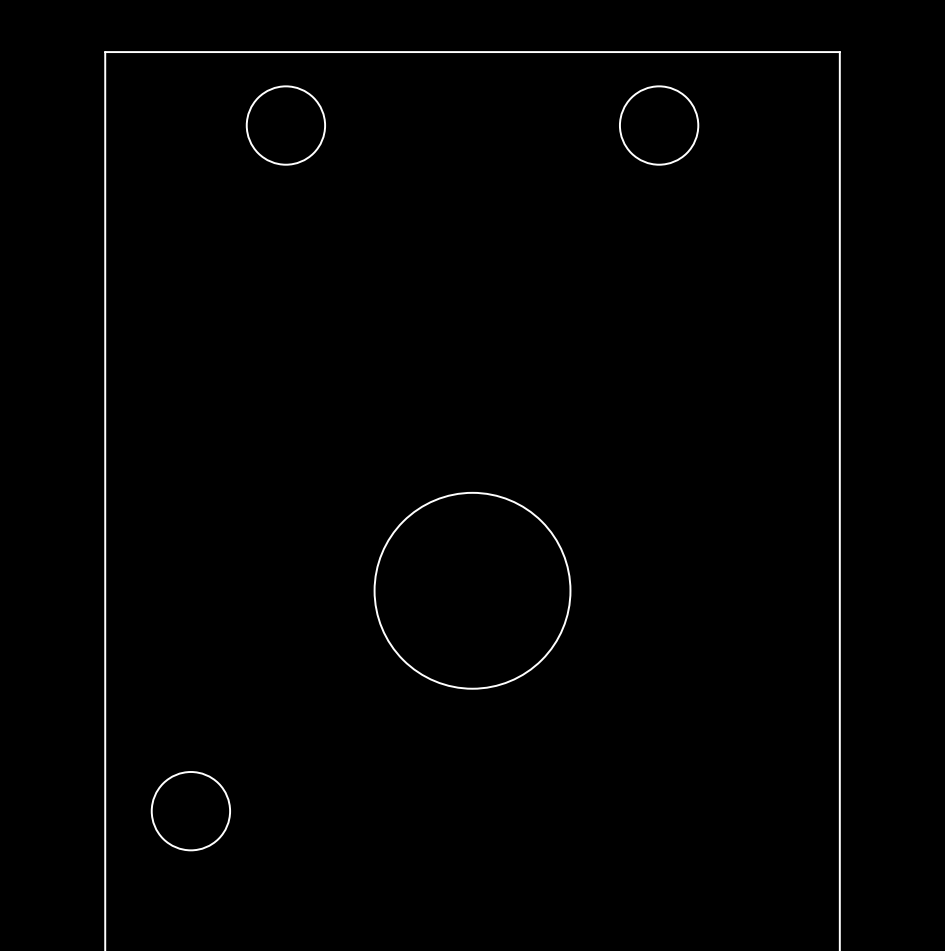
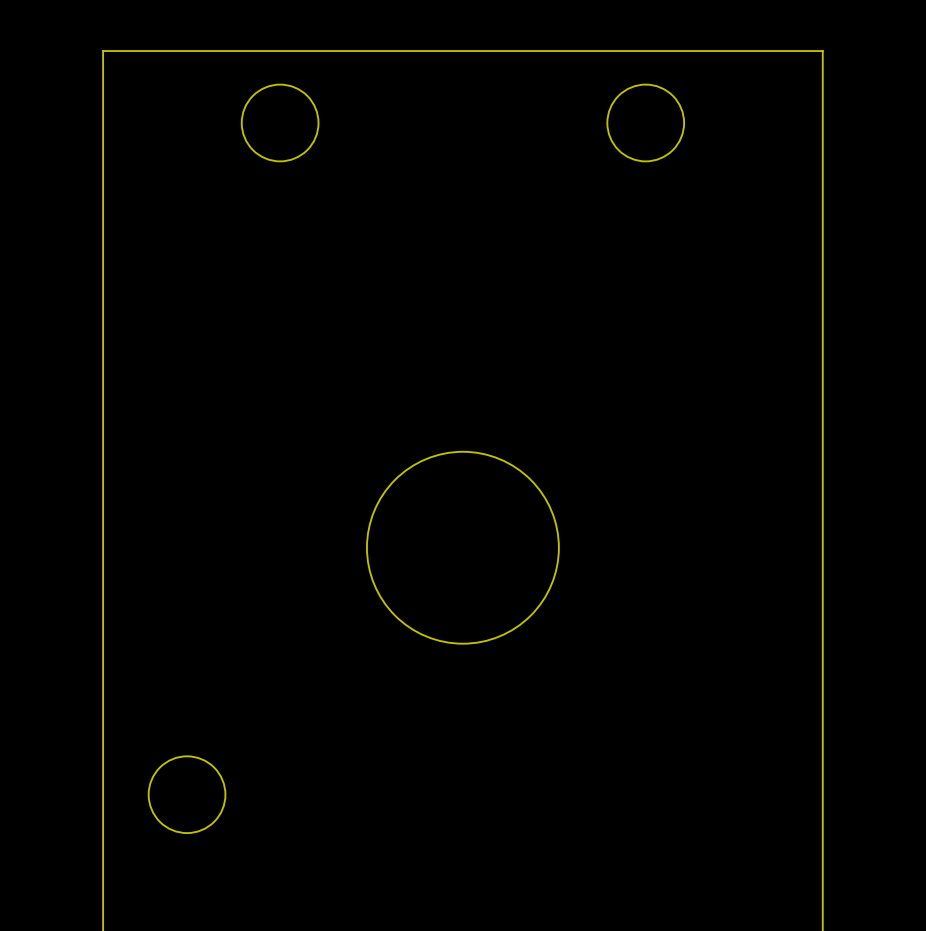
round board edge position: (472, 590) -> (462, 547)

